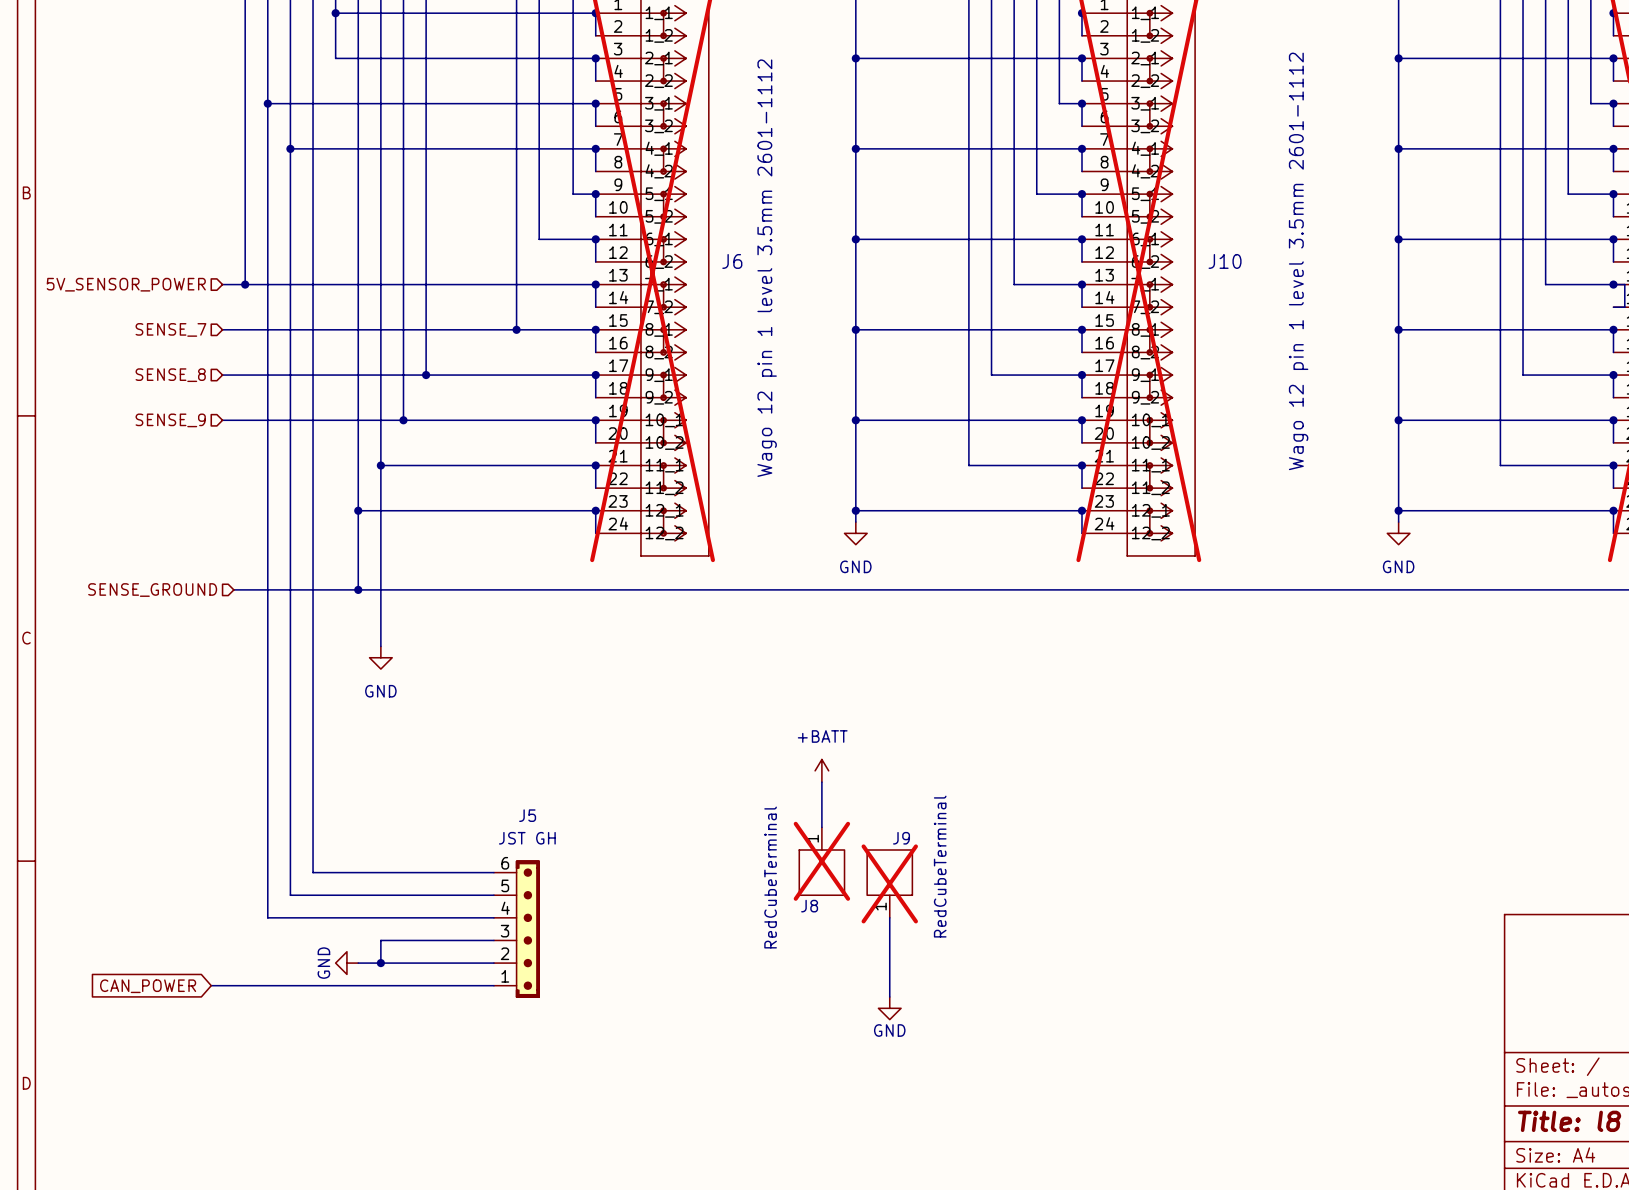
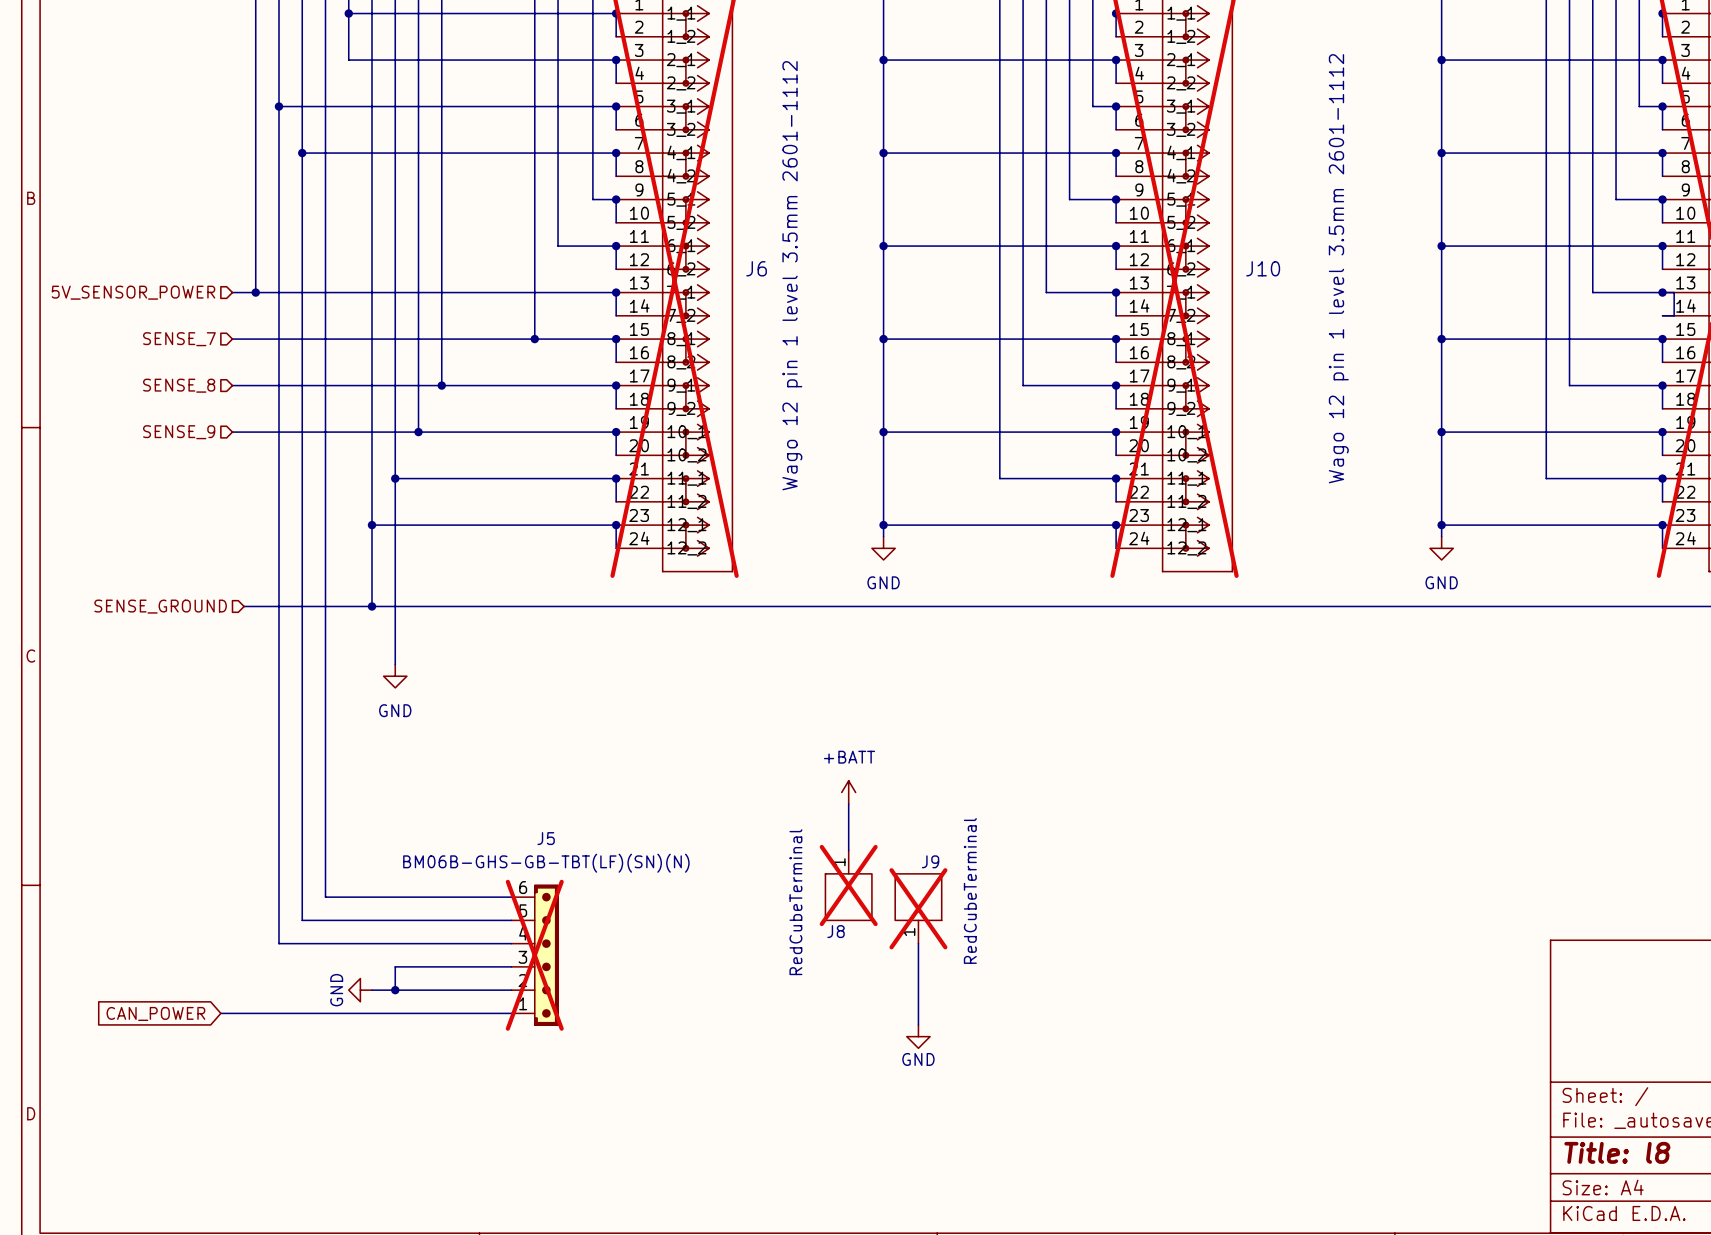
J5 value: JST GH (527, 838) -> BM06B-GHS-GB-TBT(LF)(SN)(N) (546, 863)
J5 do-not-place cross: none -> (534, 955)

